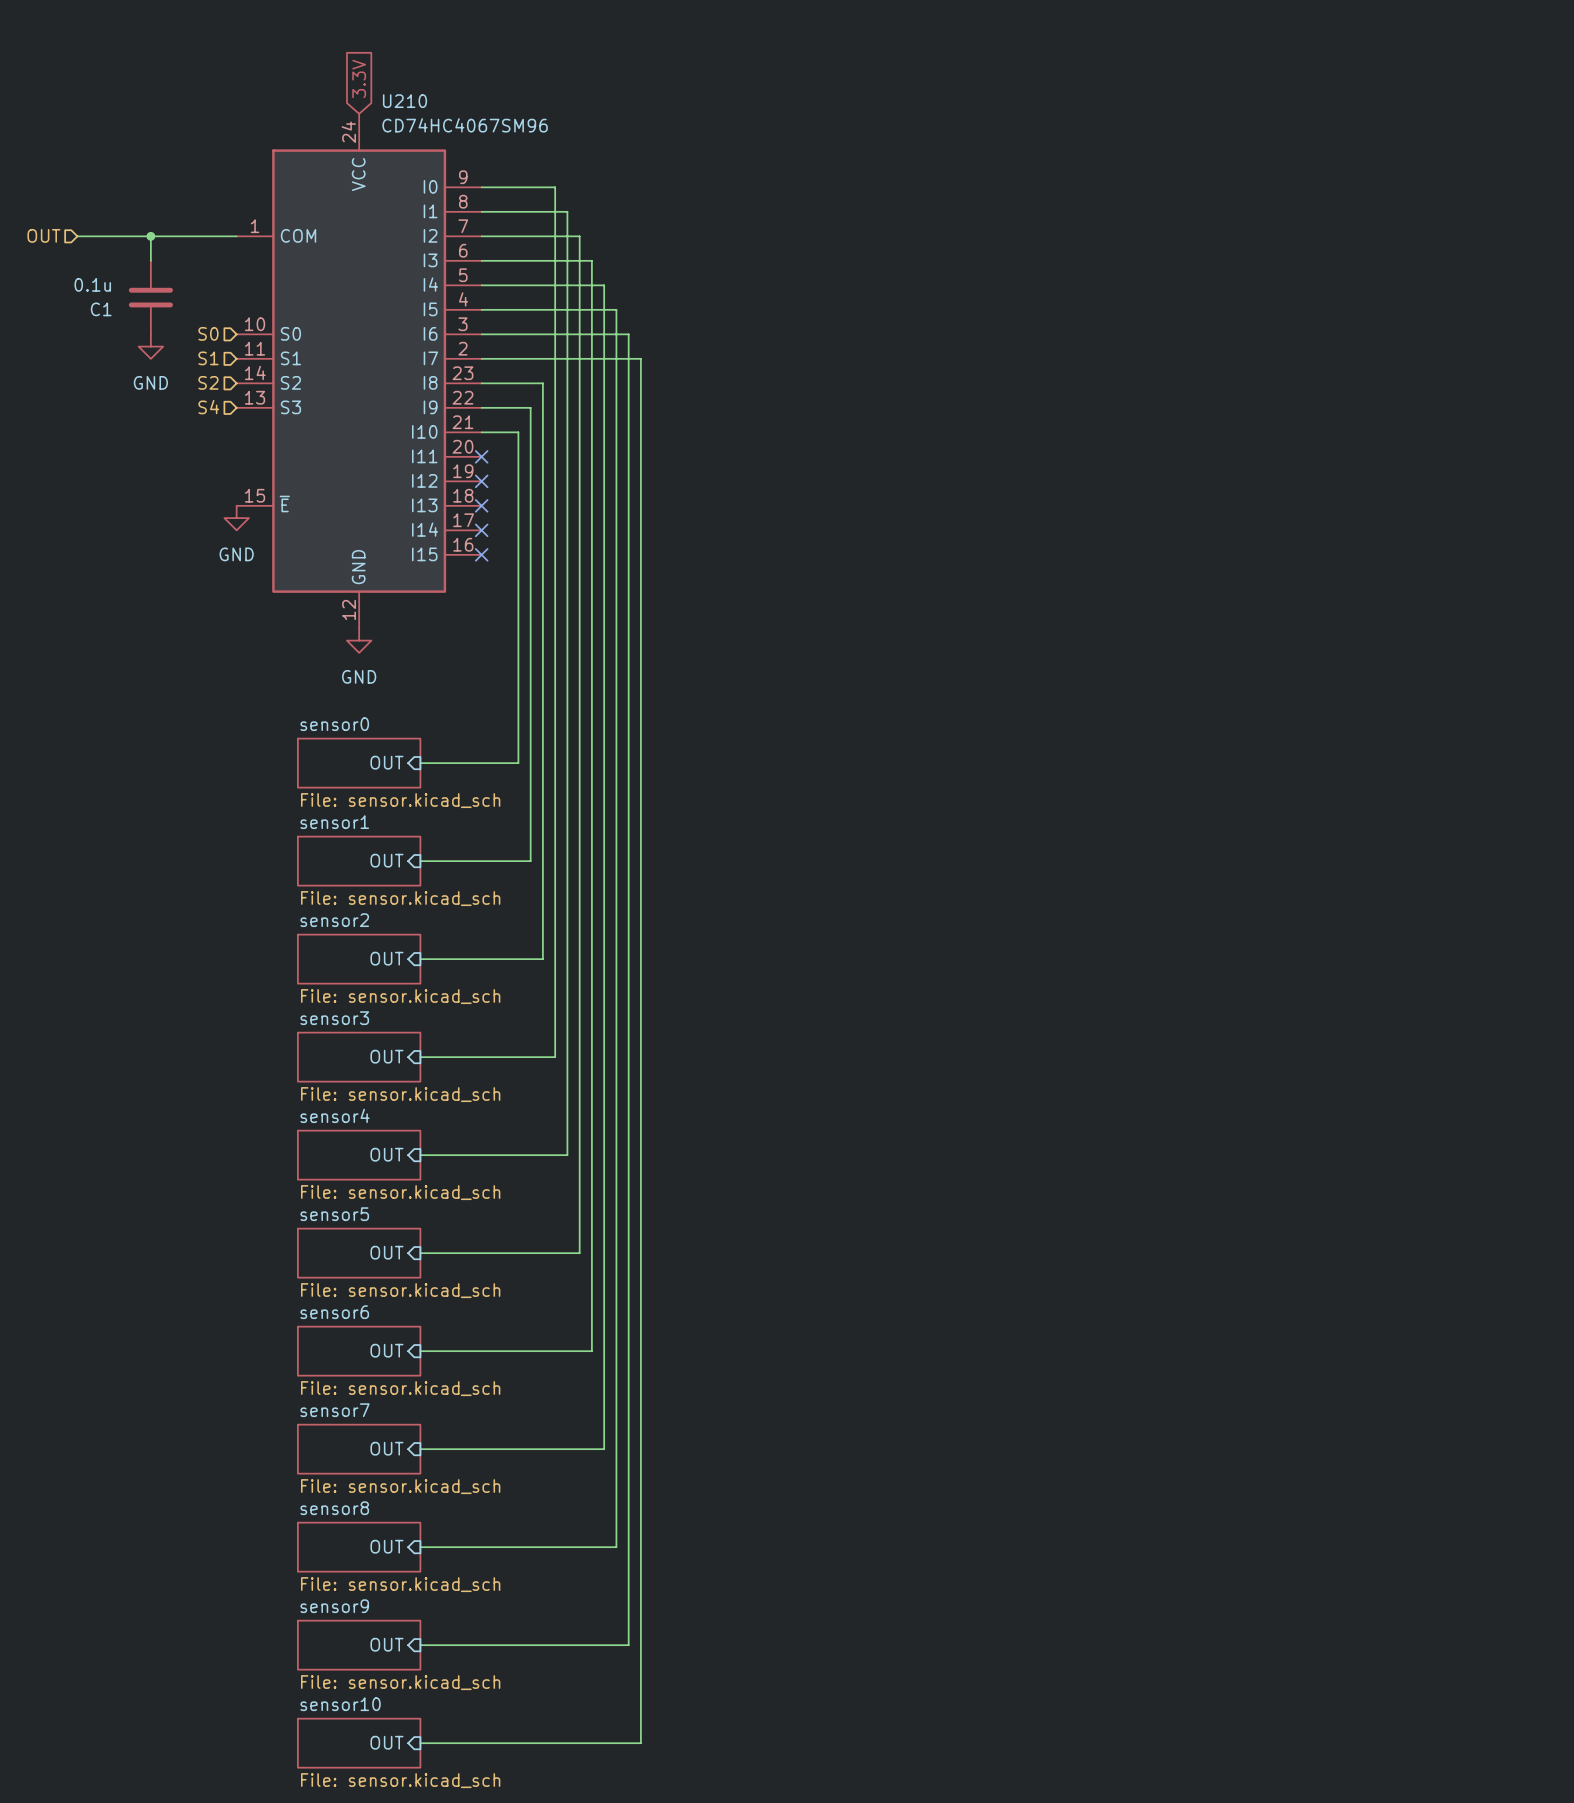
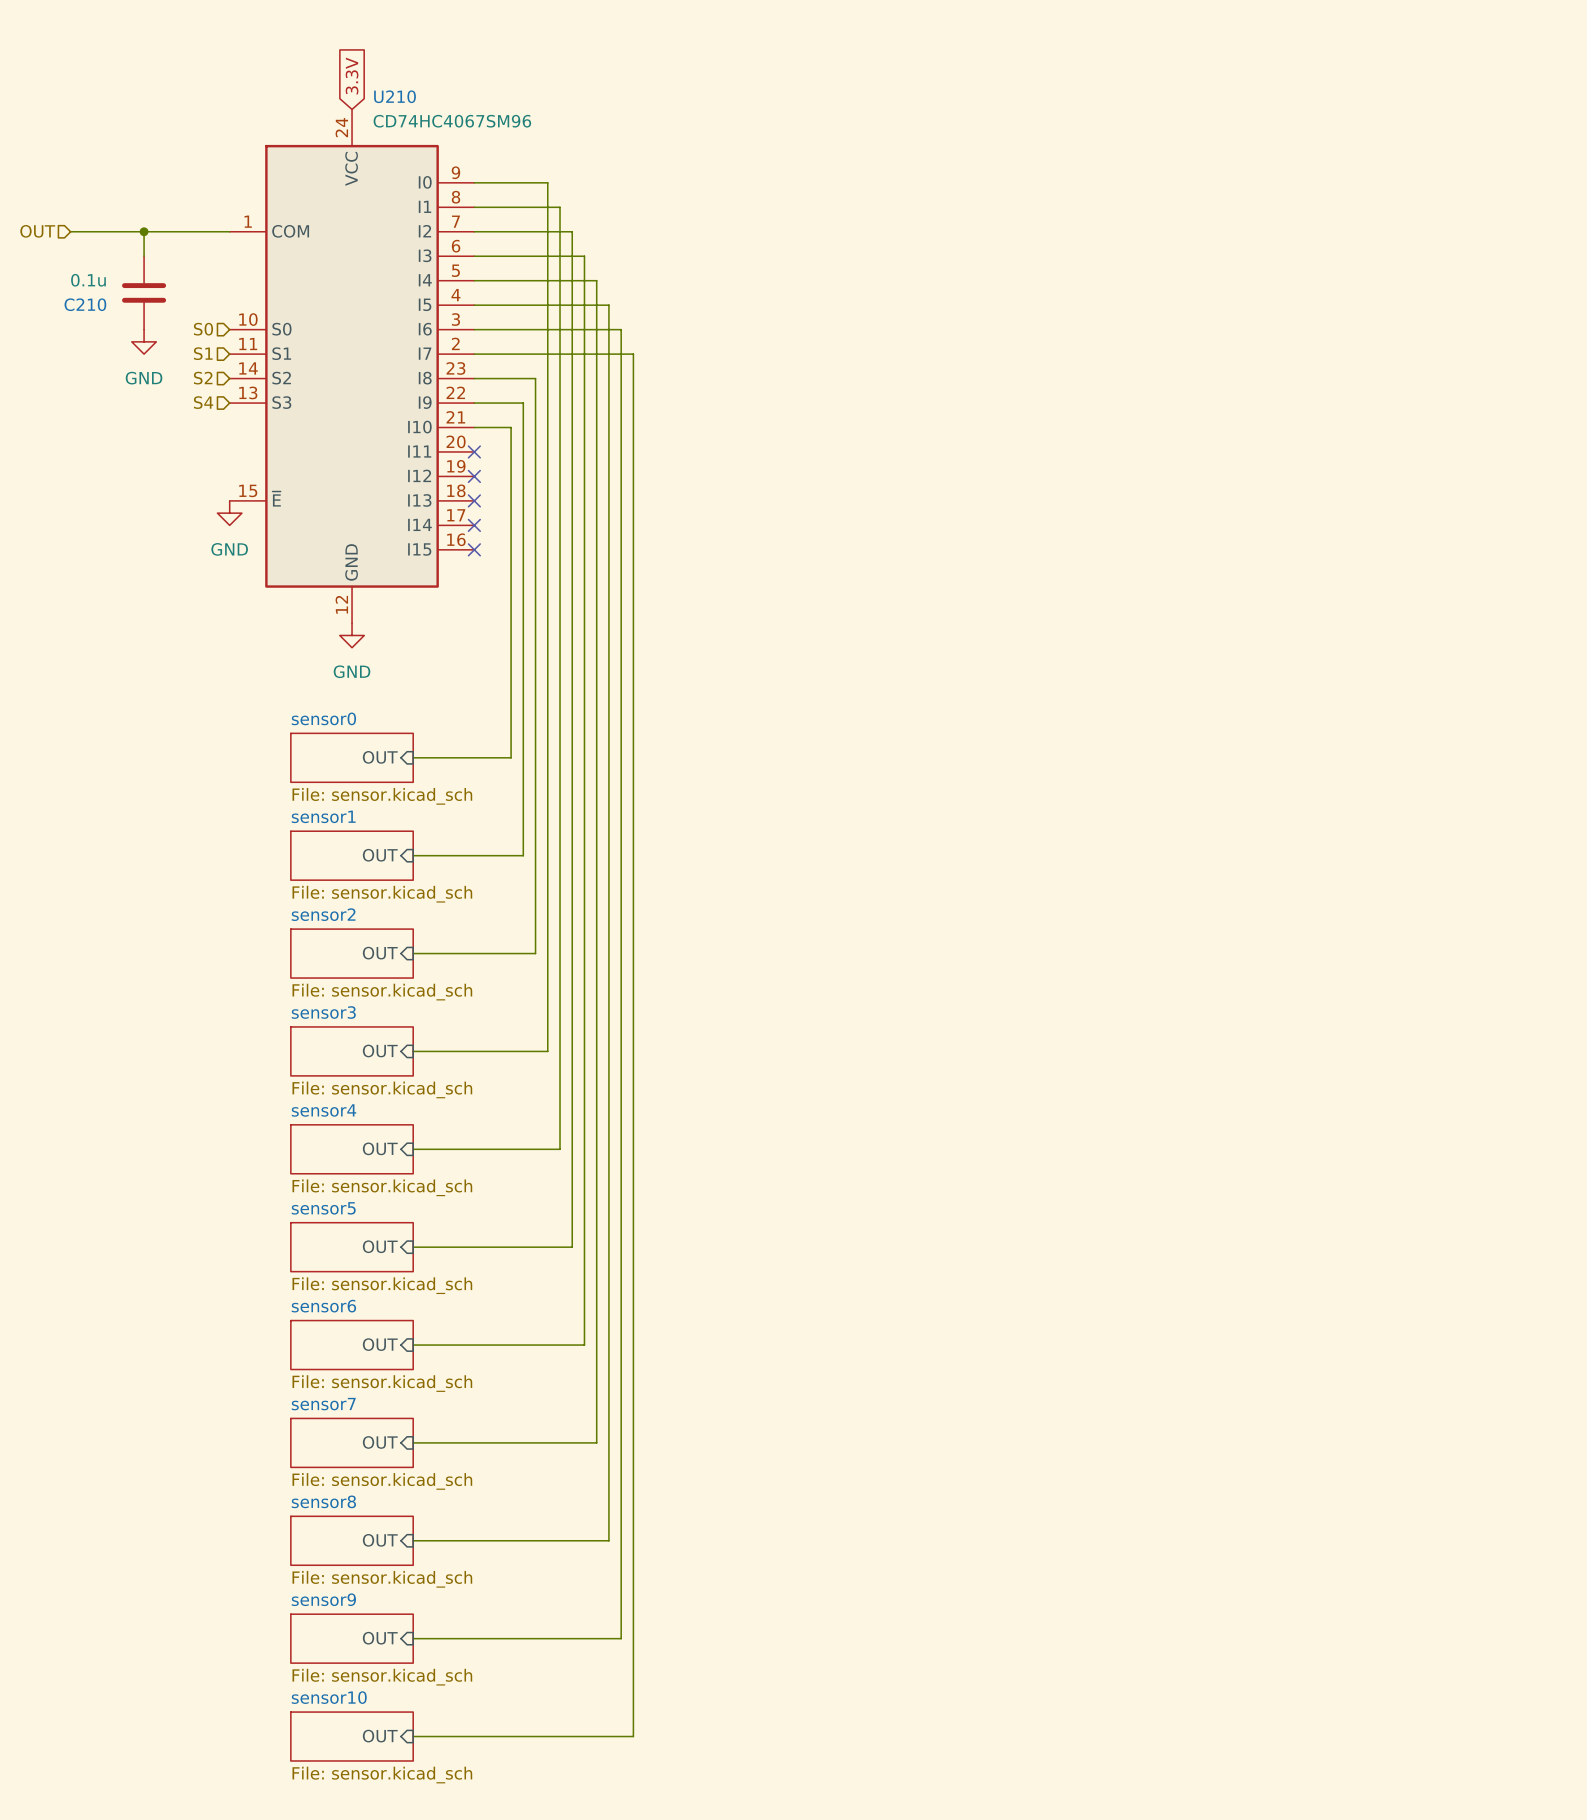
C1 name: C1 (101, 309) -> C210 (85, 304)

